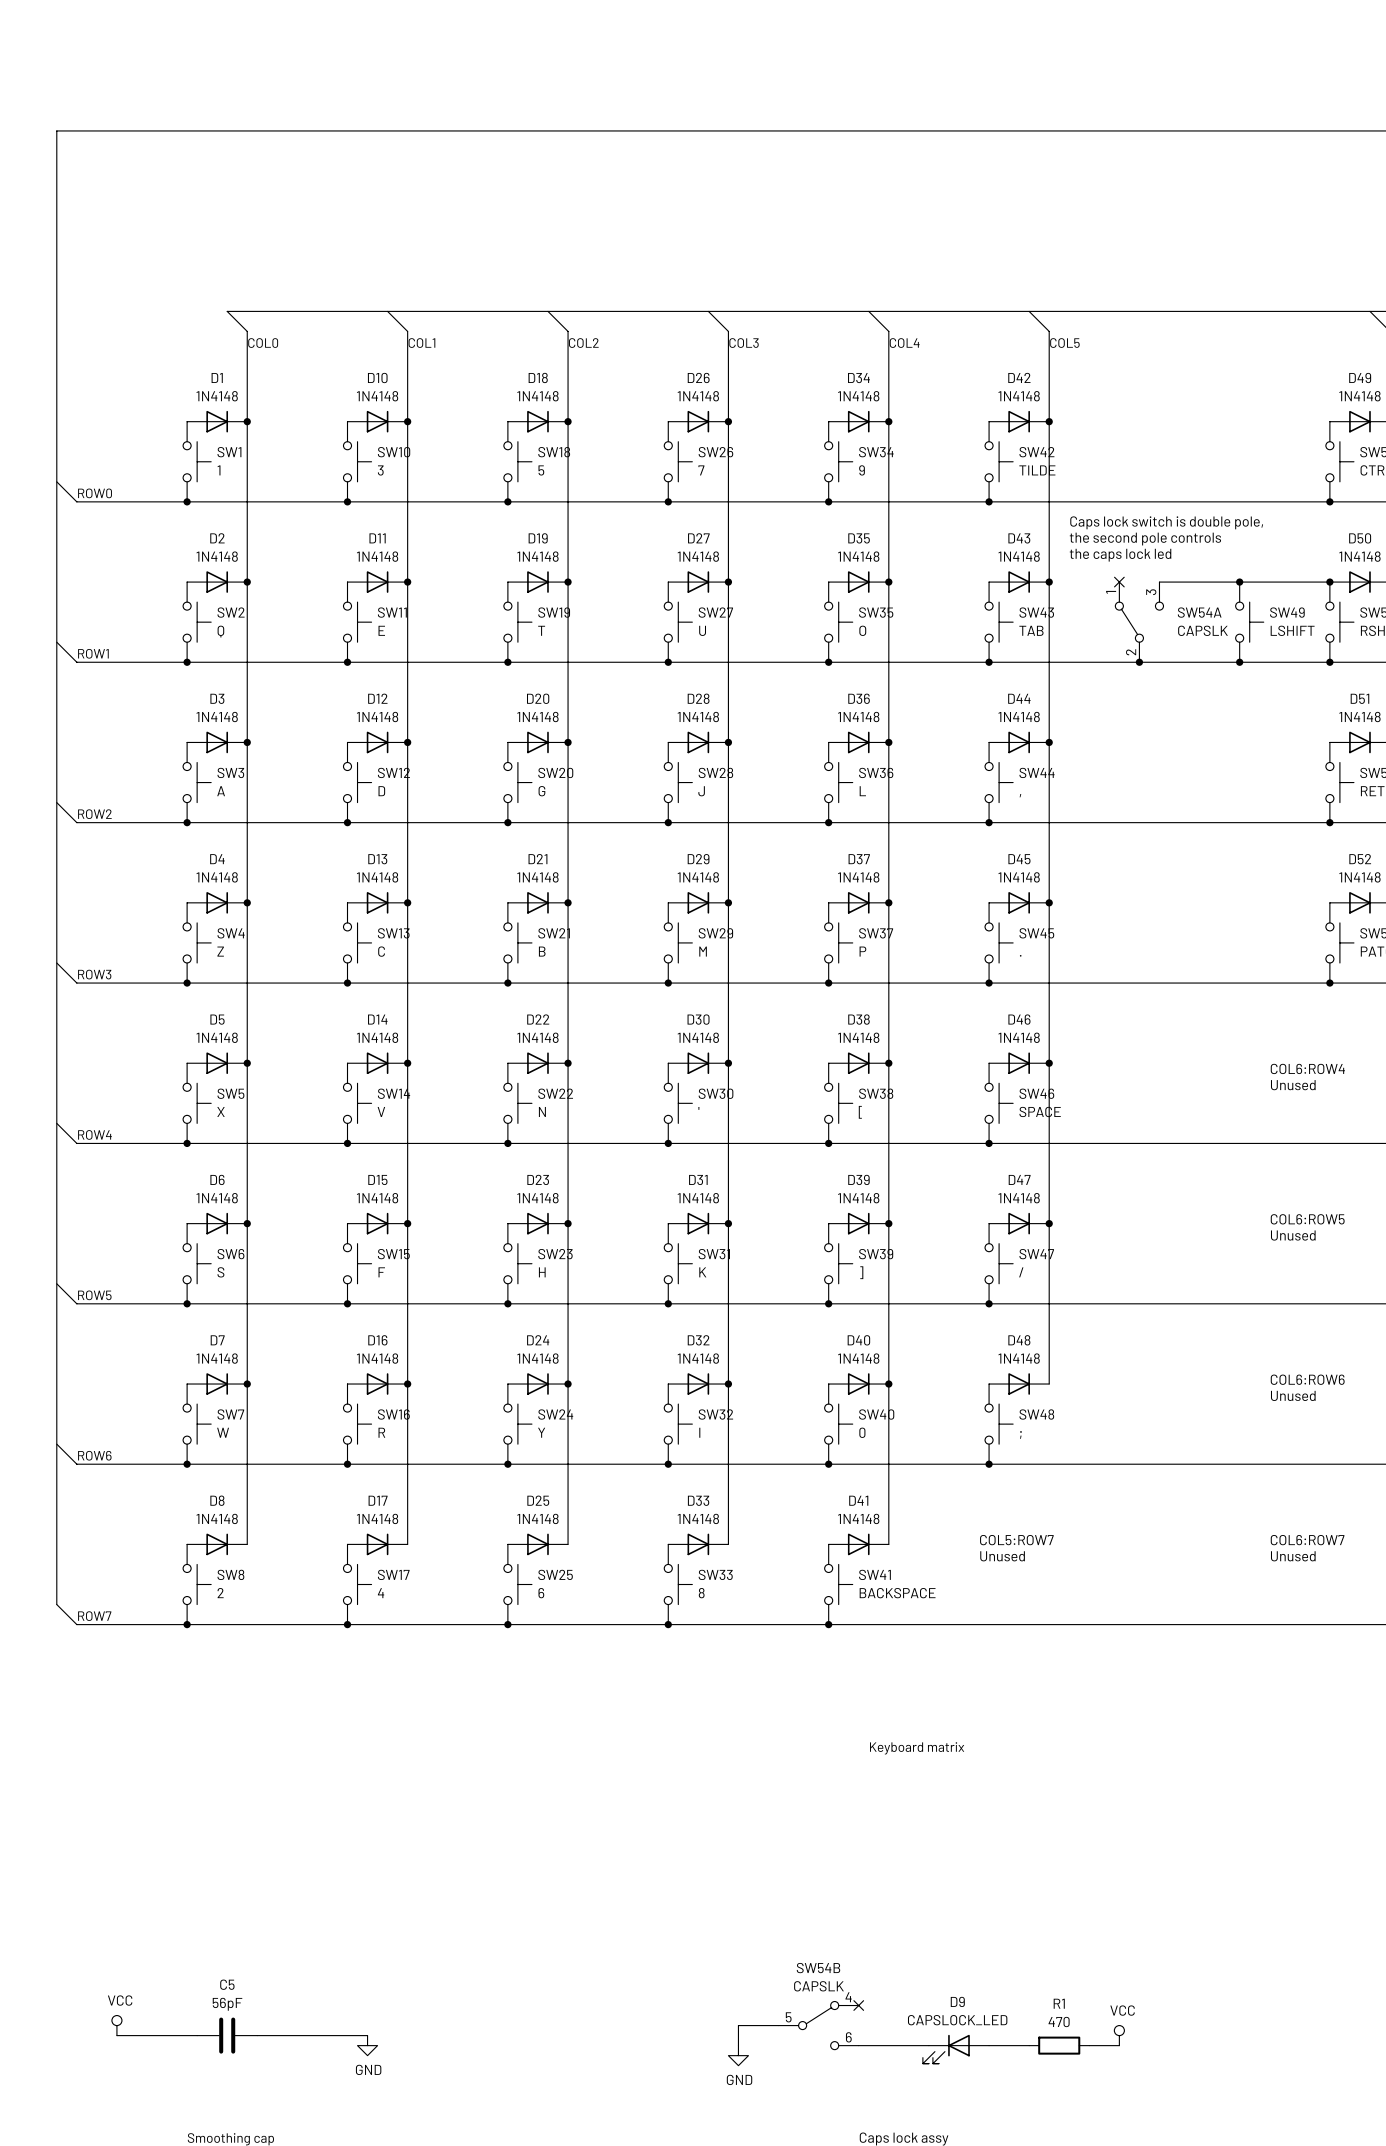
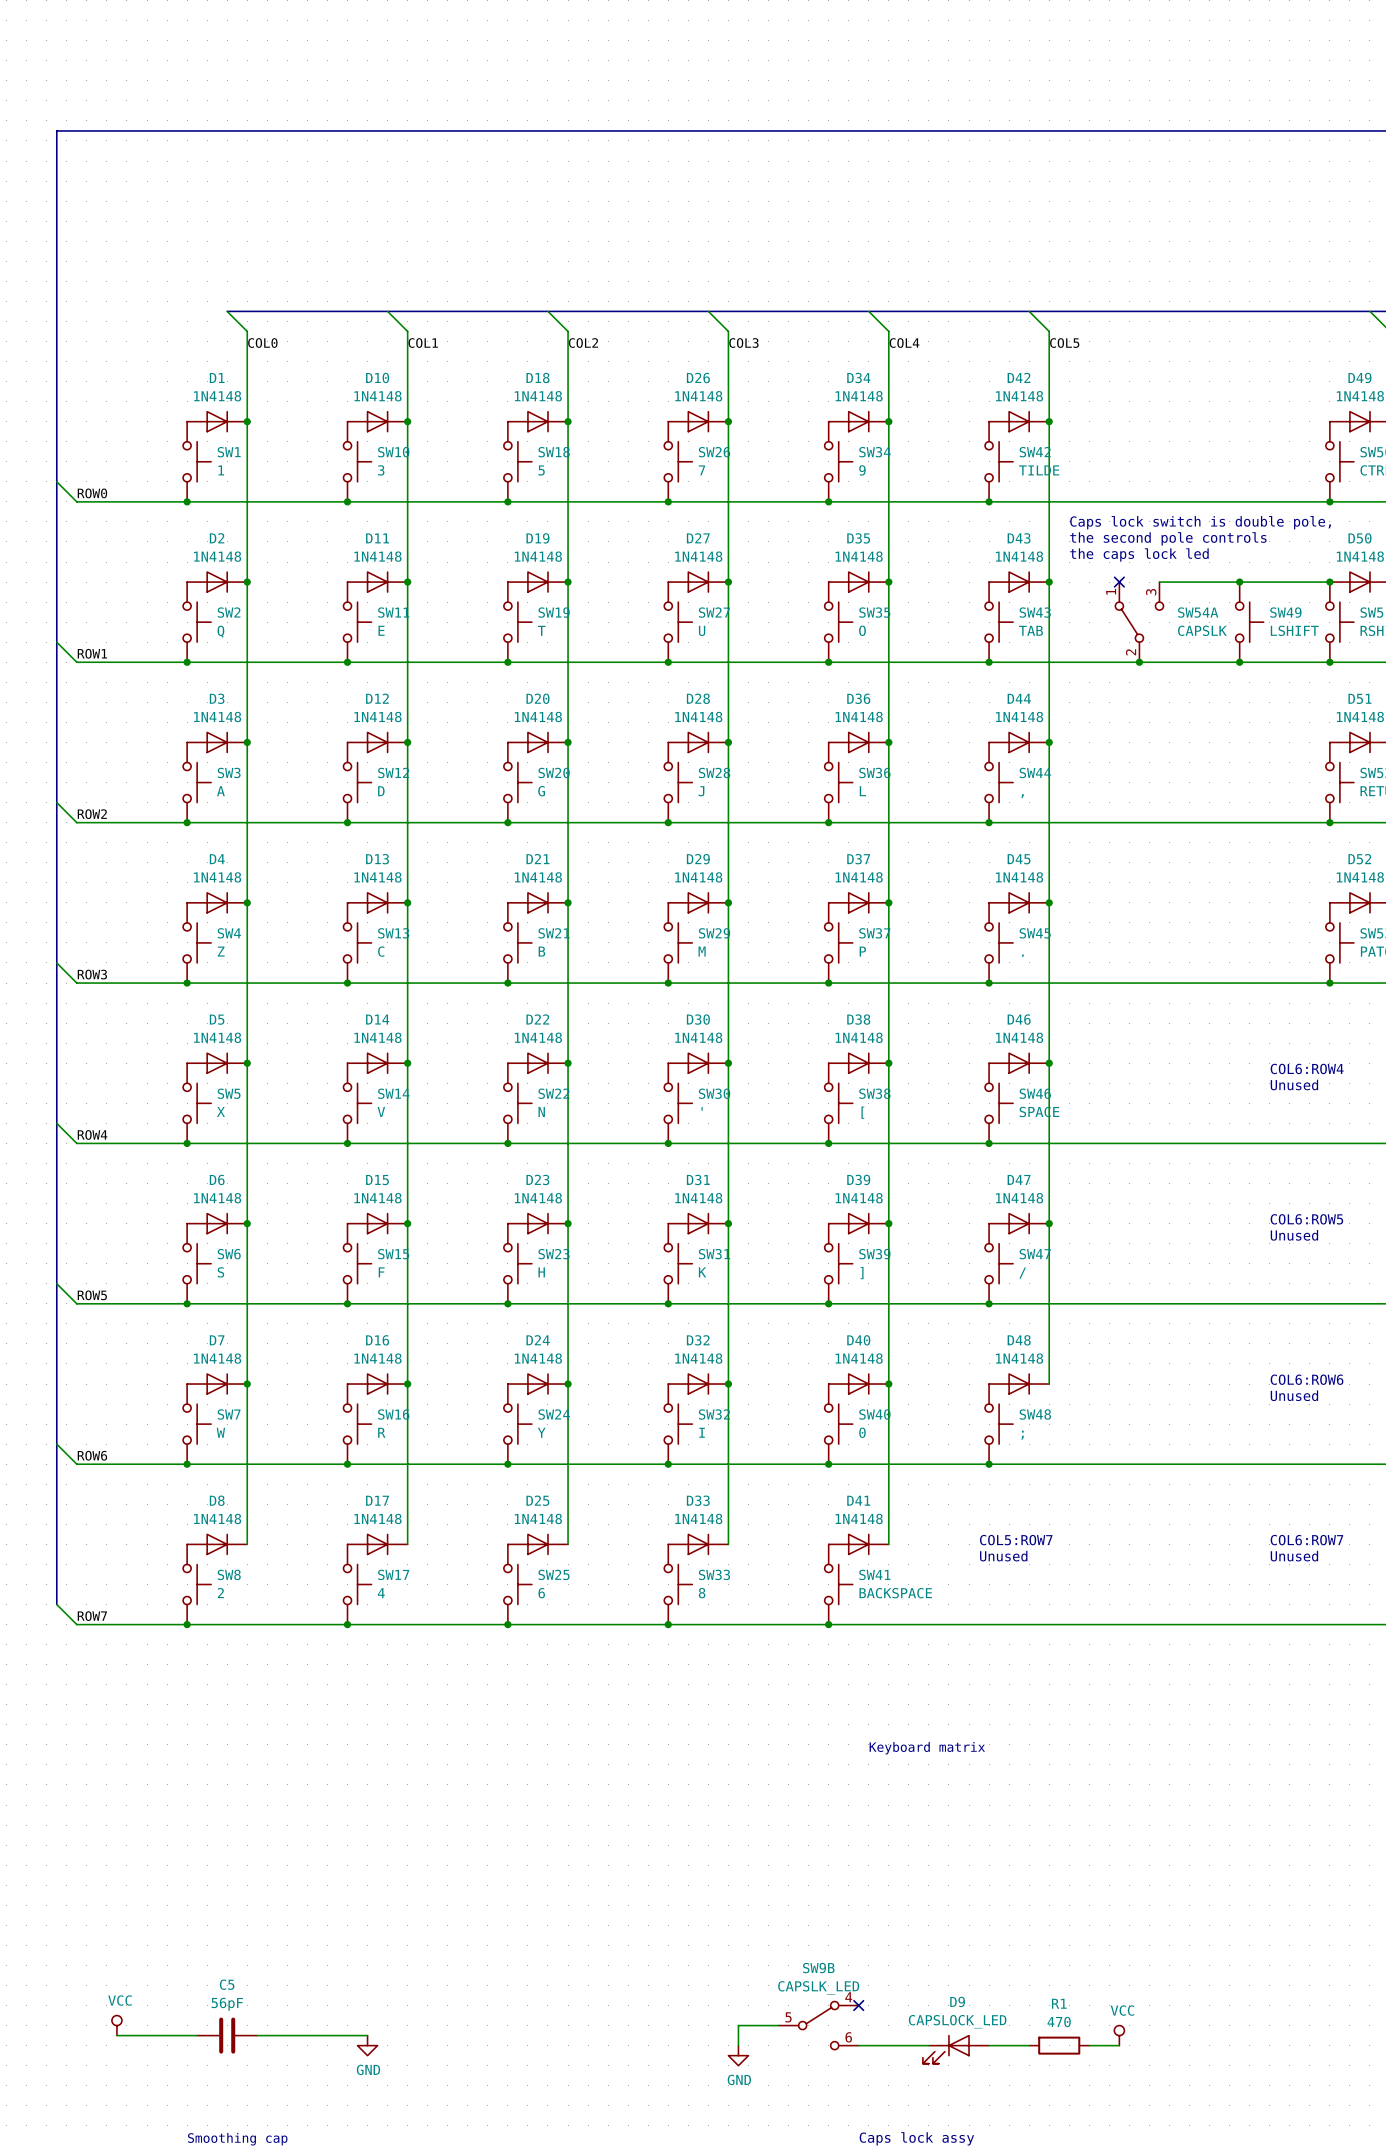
SW54B name: SW54B (818, 1968) -> SW9B (818, 1968)
SW54B value: CAPSLK (818, 1986) -> CAPSLK_LED (818, 1987)

